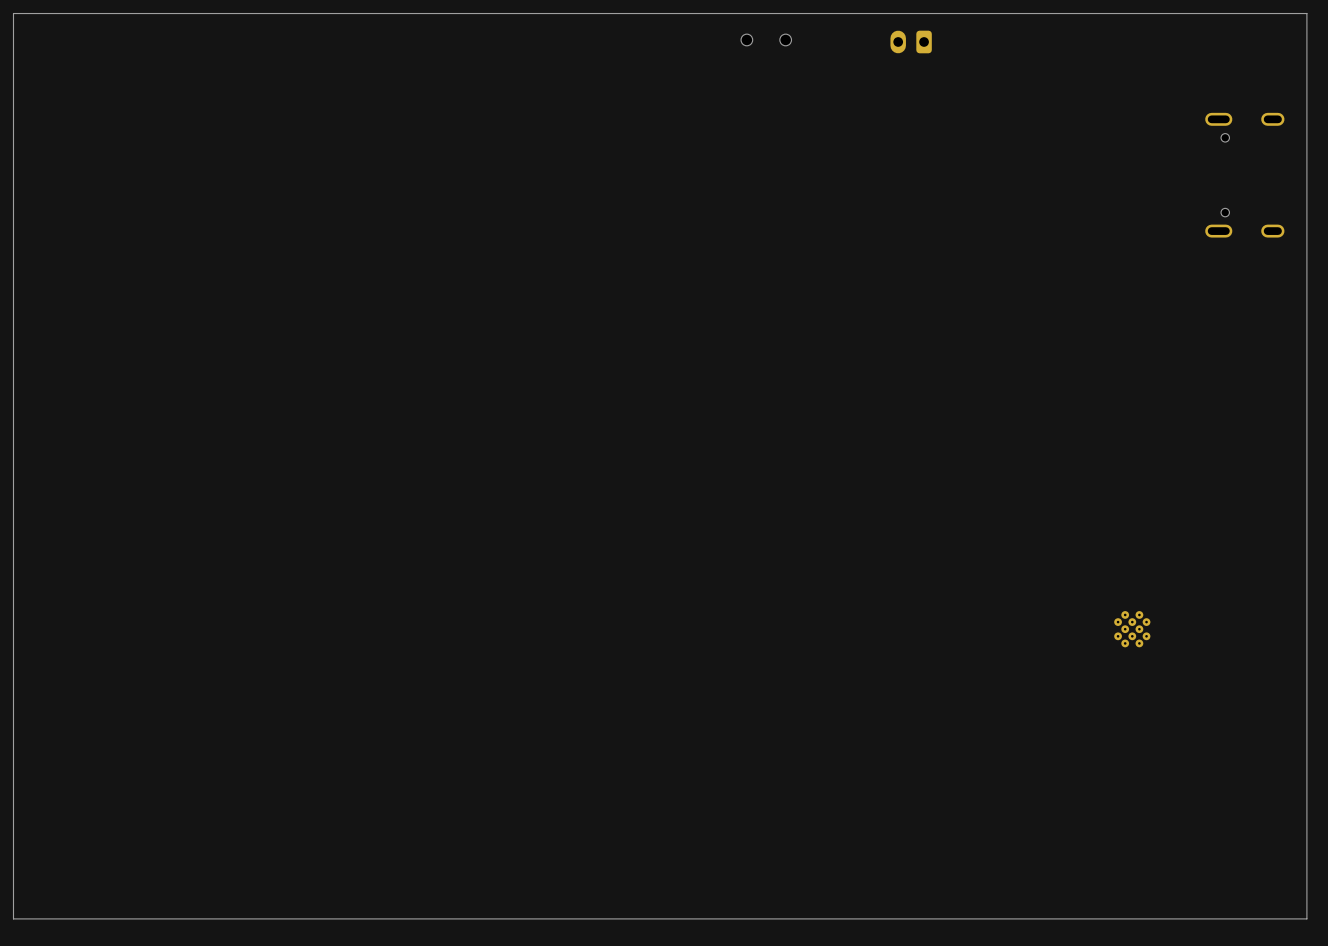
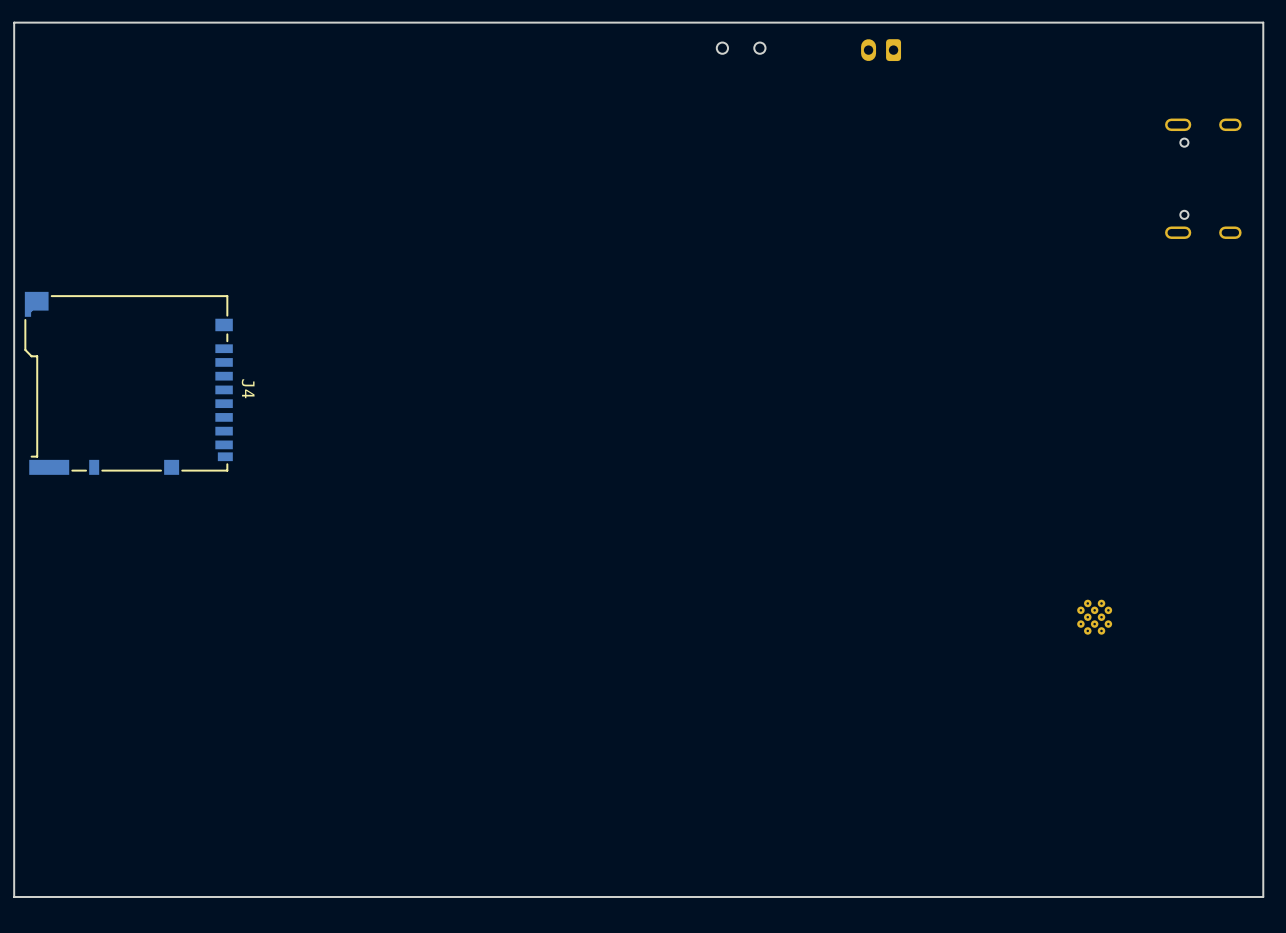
J4: none -> (128, 383)

